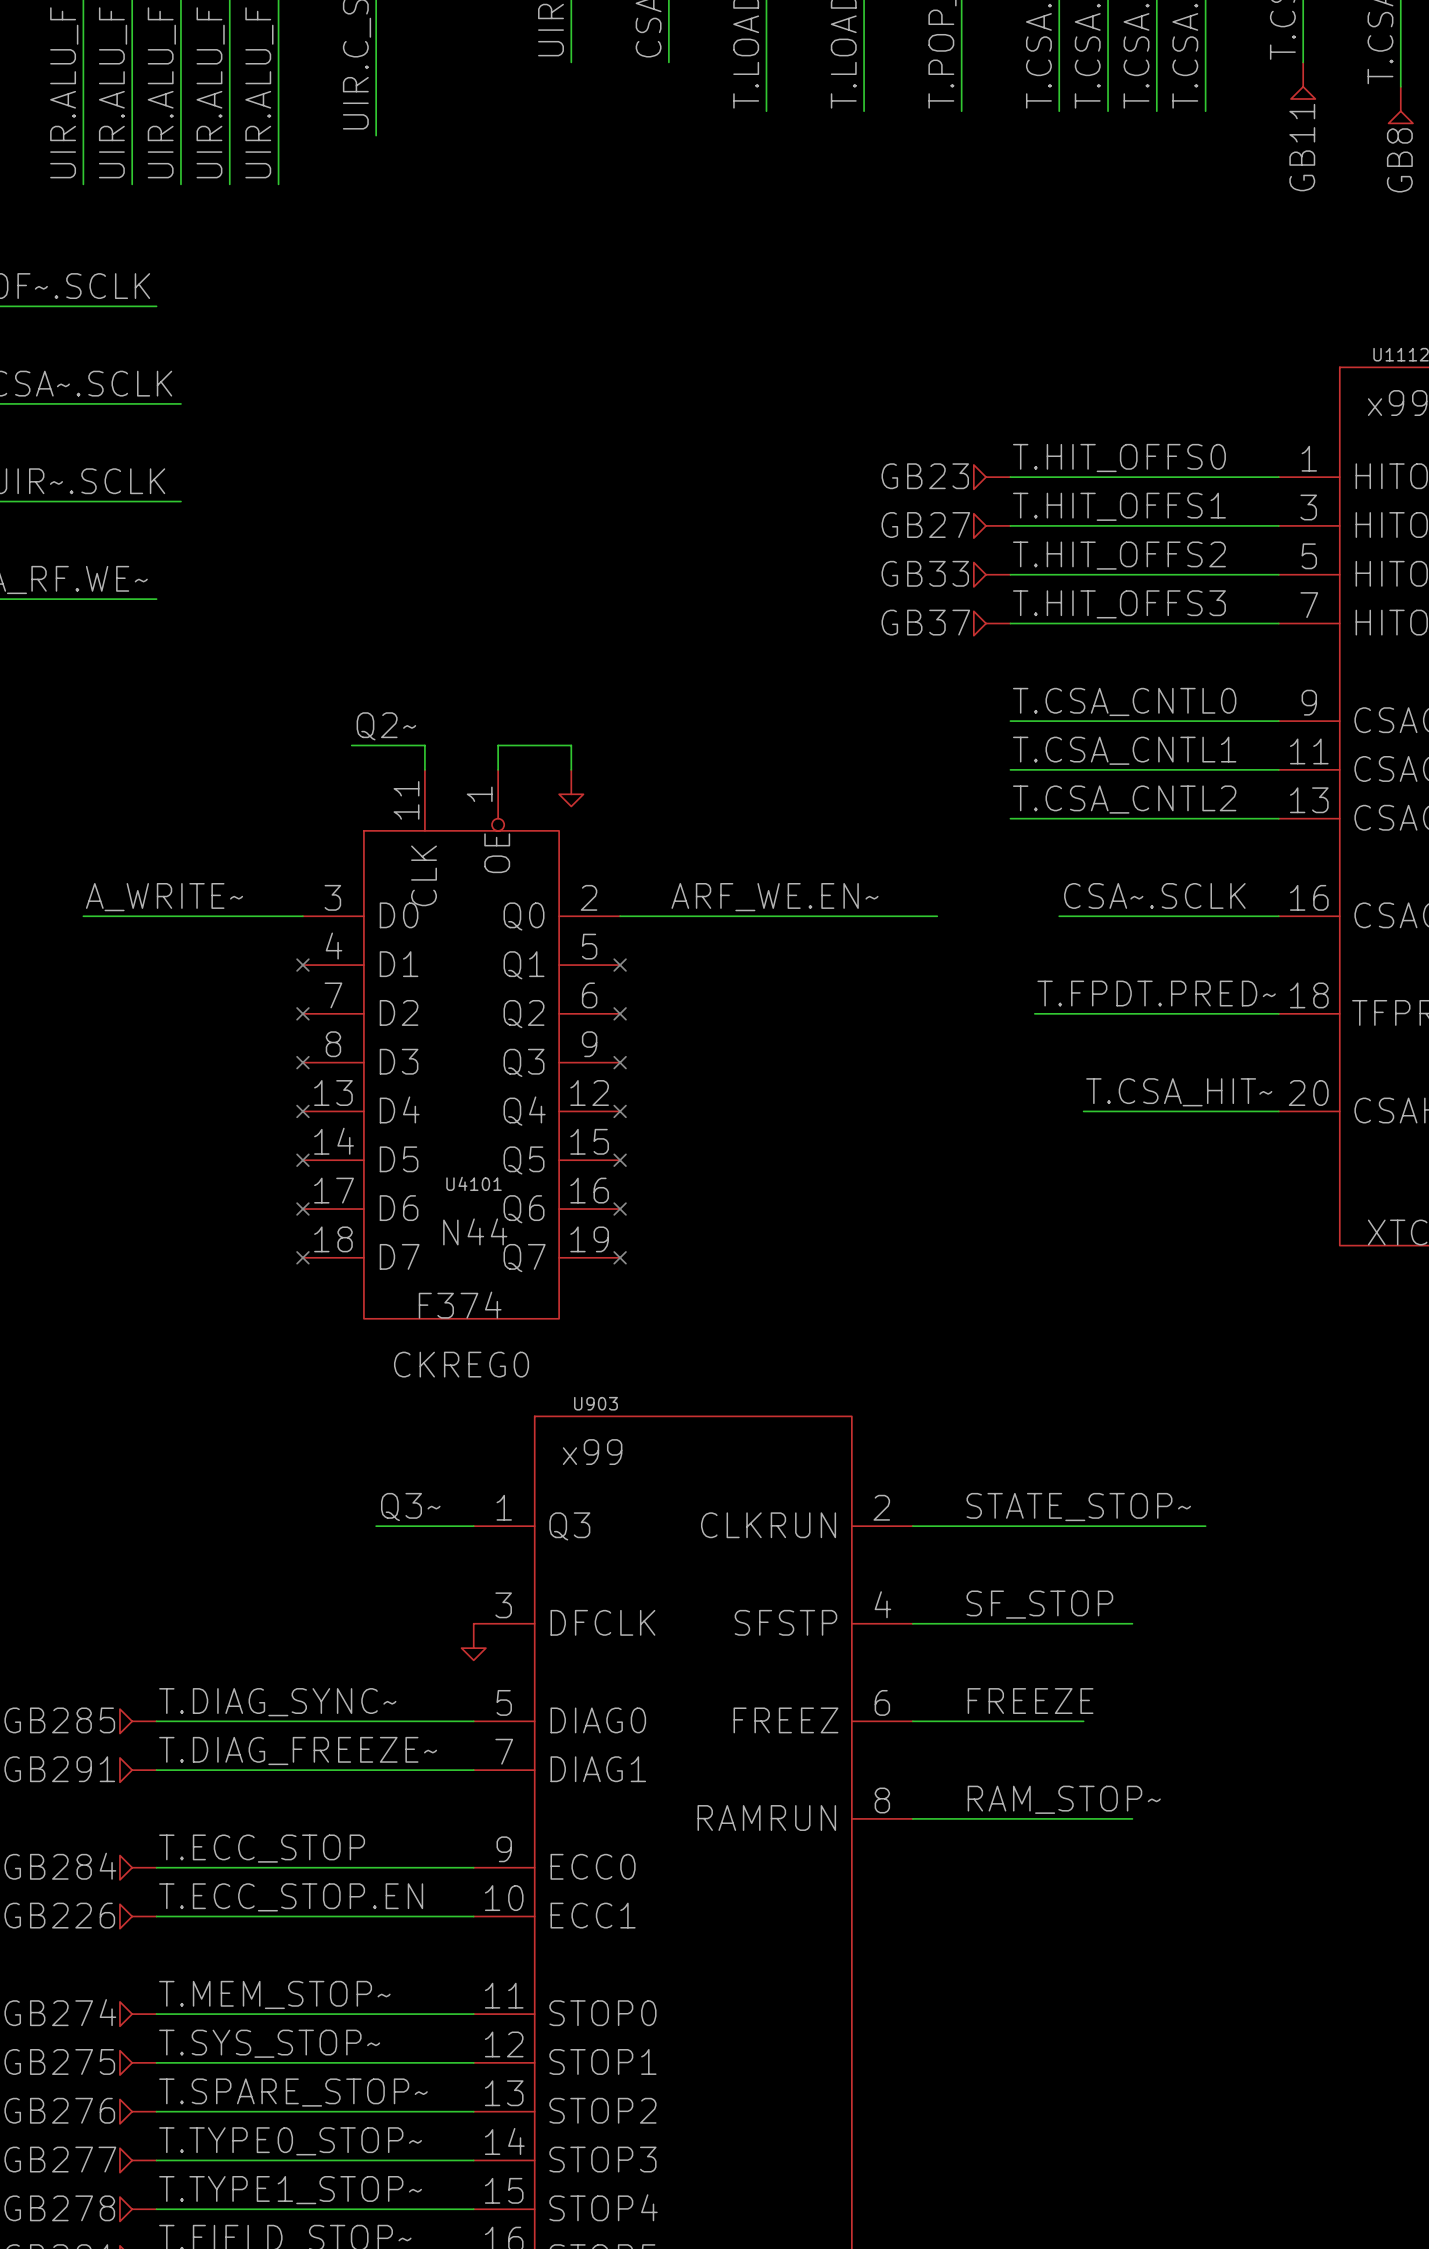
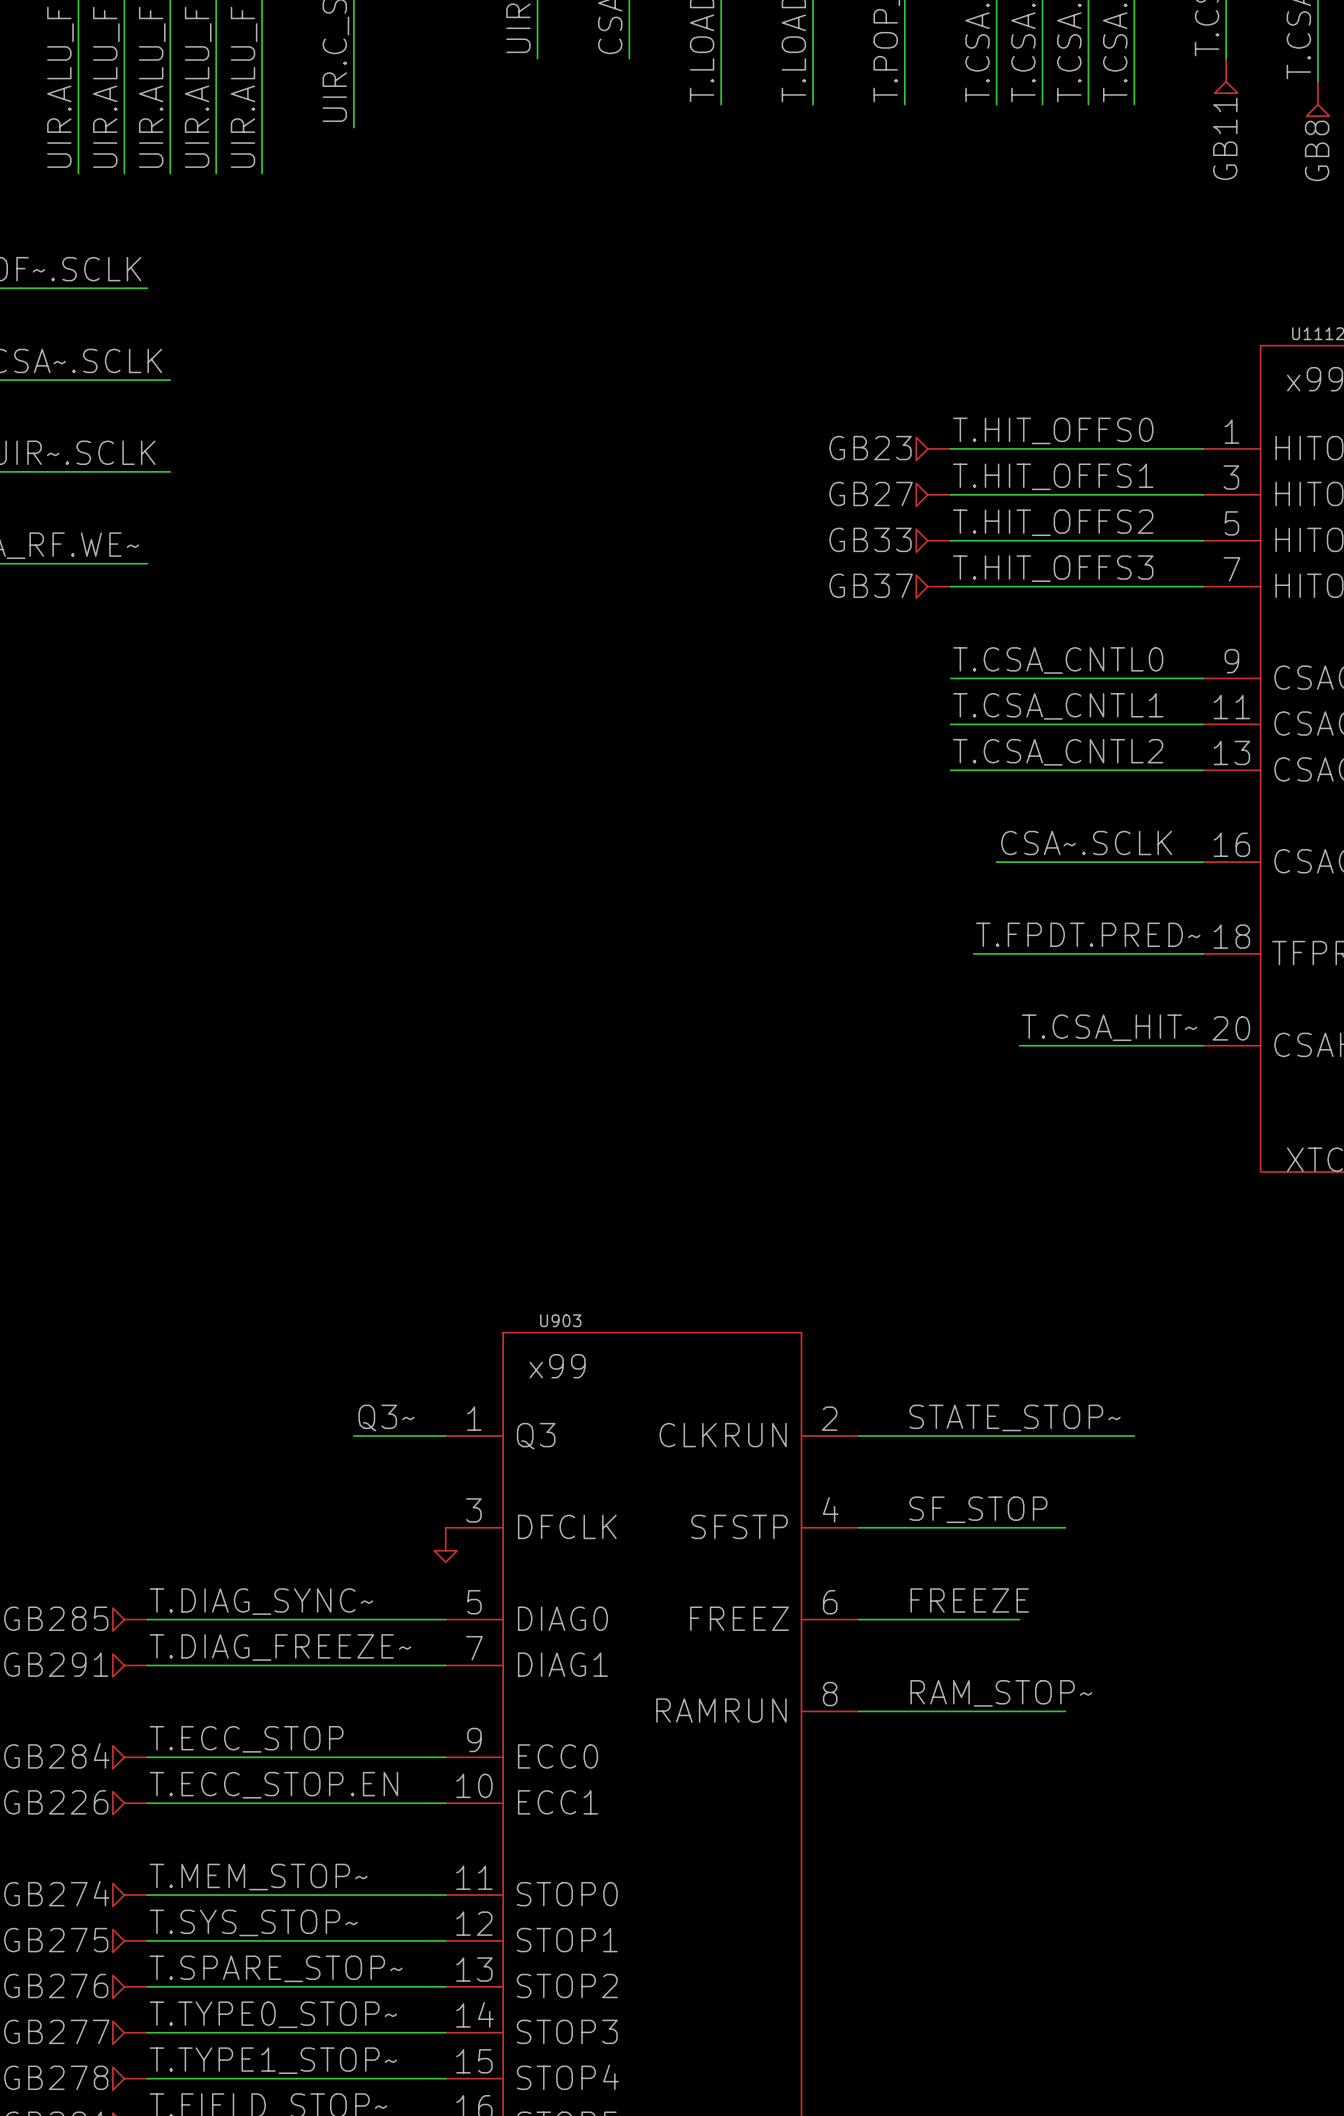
label: Q2~ (386, 726) -> none
wire: (351, 745) (424, 745) (424, 769) -> none
wire: (498, 769) (498, 745) (571, 745) (571, 769) -> none
power symbol: (571, 788) -> none
label: A_WRITE~ (164, 897) -> none
label: ARF_WE.EN~ (774, 897) -> none
wire: (83, 916) (302, 916) -> none
wire: (620, 916) (937, 916) -> none
no-connect mark: (302, 965) -> none
no-connect mark: (620, 965) -> none
no-connect mark: (302, 1013) -> none
no-connect mark: (620, 1013) -> none
U4101: F374 (461, 1044) -> none
no-connect mark: (302, 1062) -> none
no-connect mark: (620, 1062) -> none
no-connect mark: (302, 1111) -> none
no-connect mark: (620, 1111) -> none
no-connect mark: (302, 1160) -> none
no-connect mark: (620, 1160) -> none
no-connect mark: (302, 1209) -> none
no-connect mark: (620, 1209) -> none
no-connect mark: (302, 1257) -> none
no-connect mark: (620, 1257) -> none

